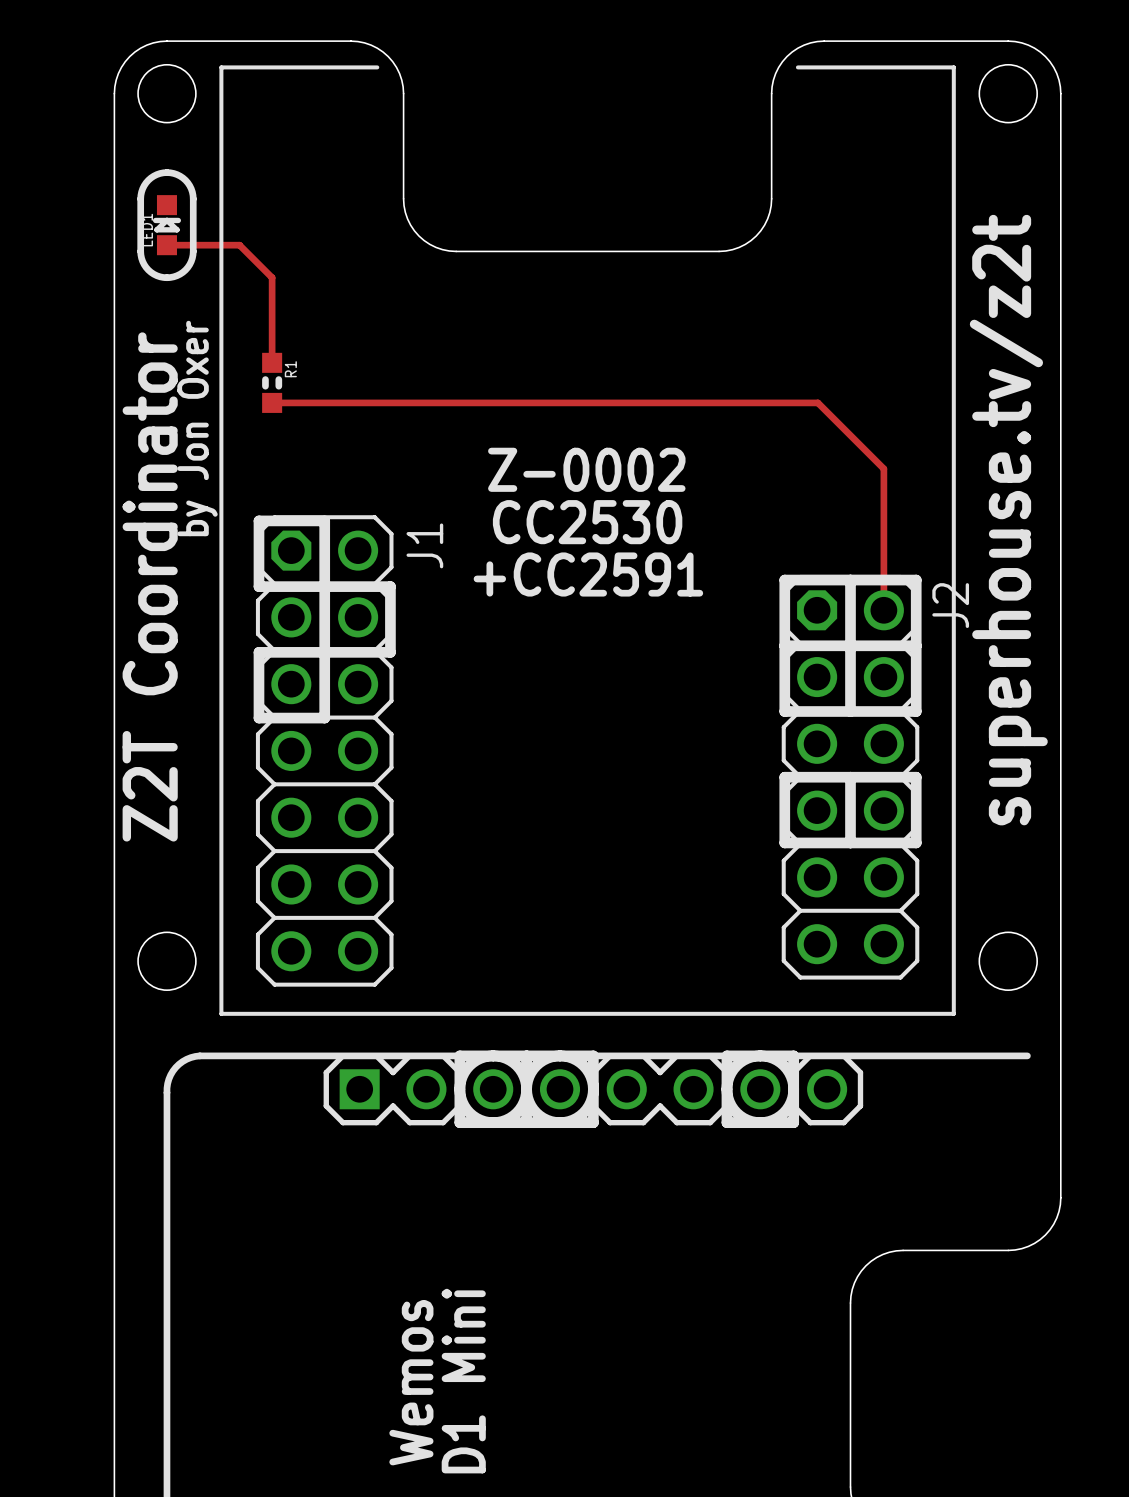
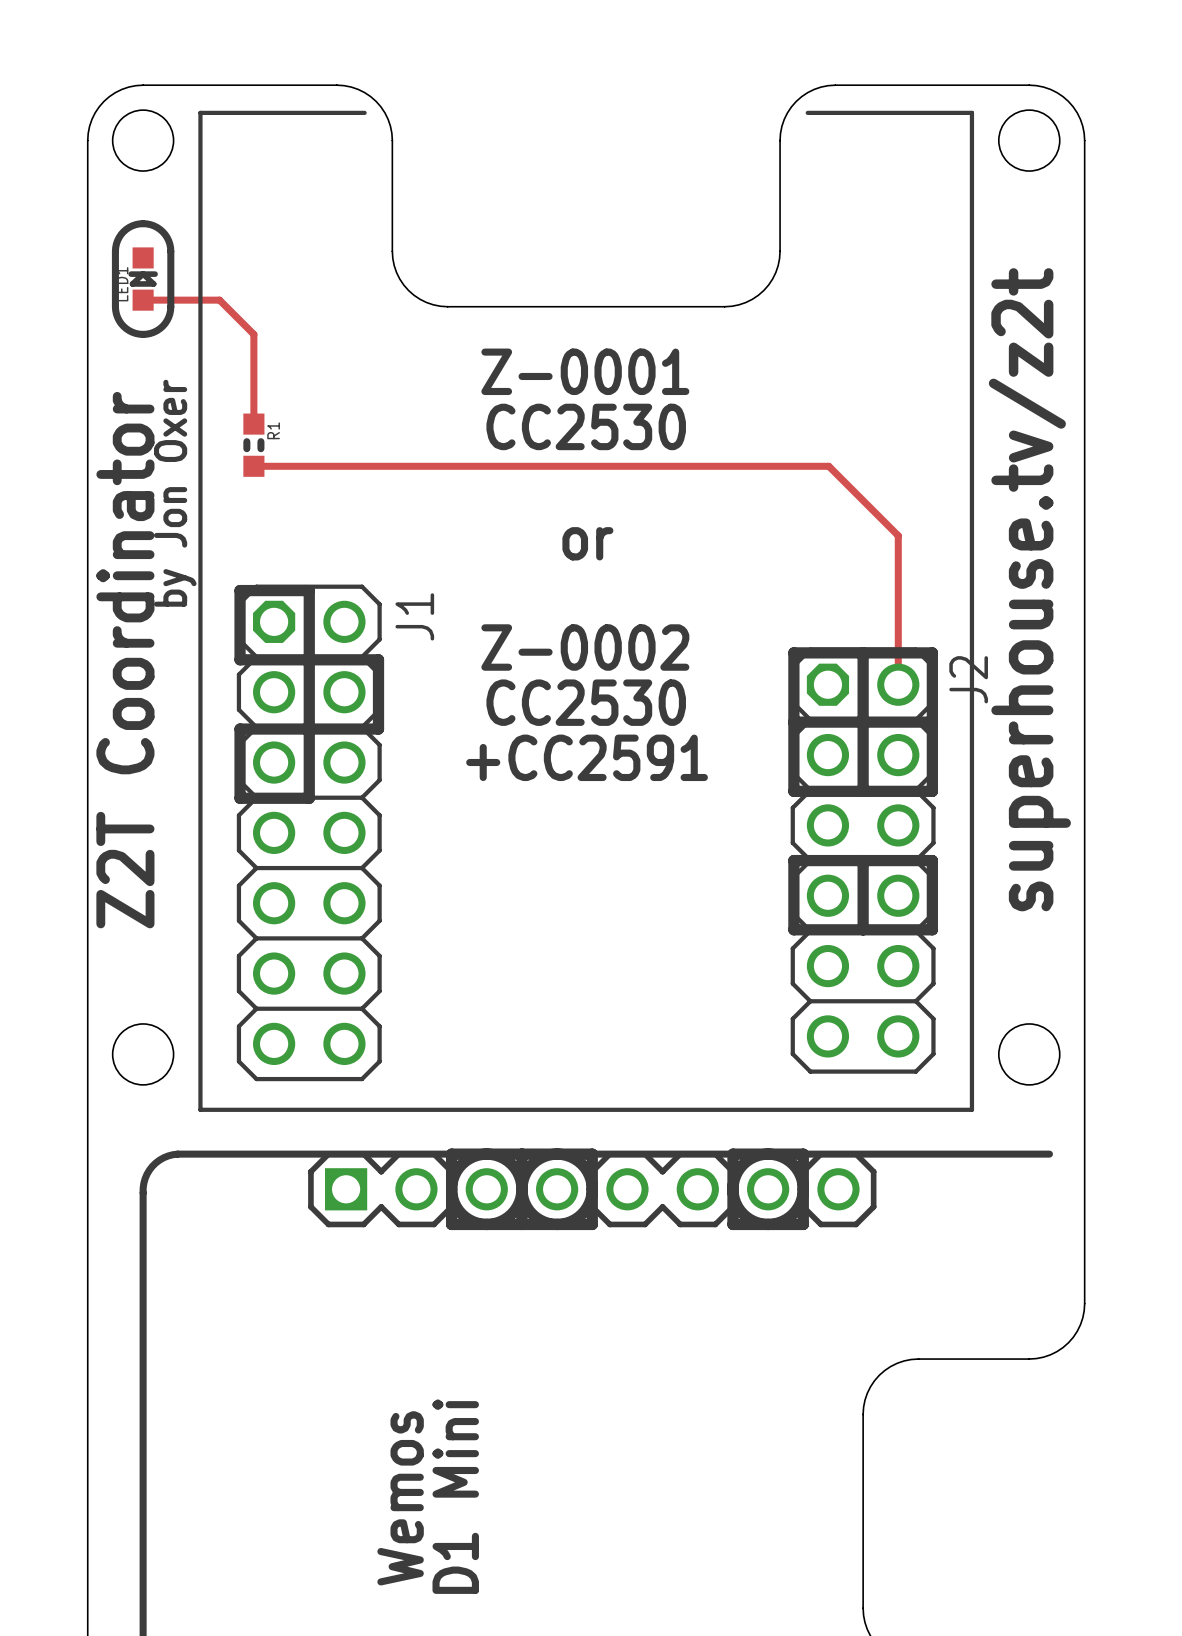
text: none -> Z-0001 (585, 371)
text: none -> CC2530 (586, 426)
text: Z-0002 (586, 469) -> or (587, 543)
text: CC2530 (587, 522) -> none
text: +CC2591 (588, 574) -> Z-0002 (585, 647)
text: none -> CC2530 (586, 702)
text: none -> +CC2591 (587, 757)

